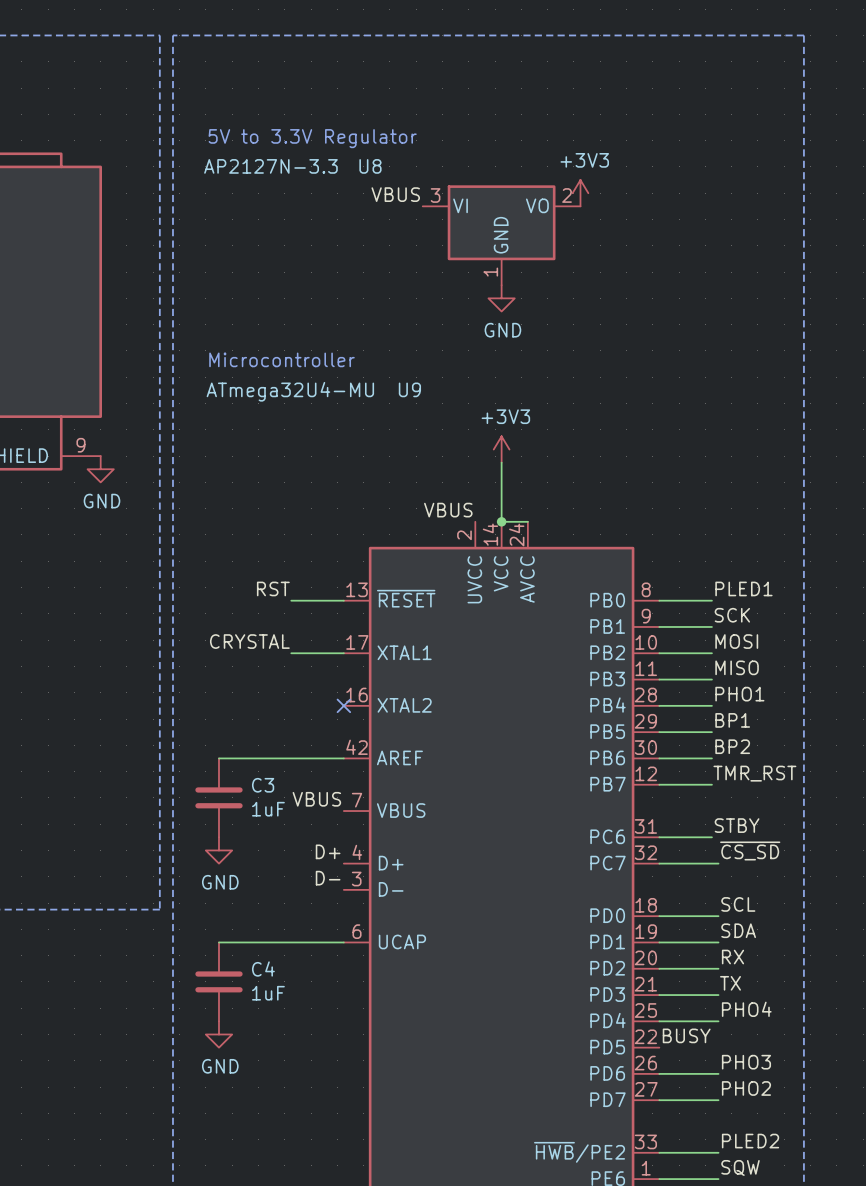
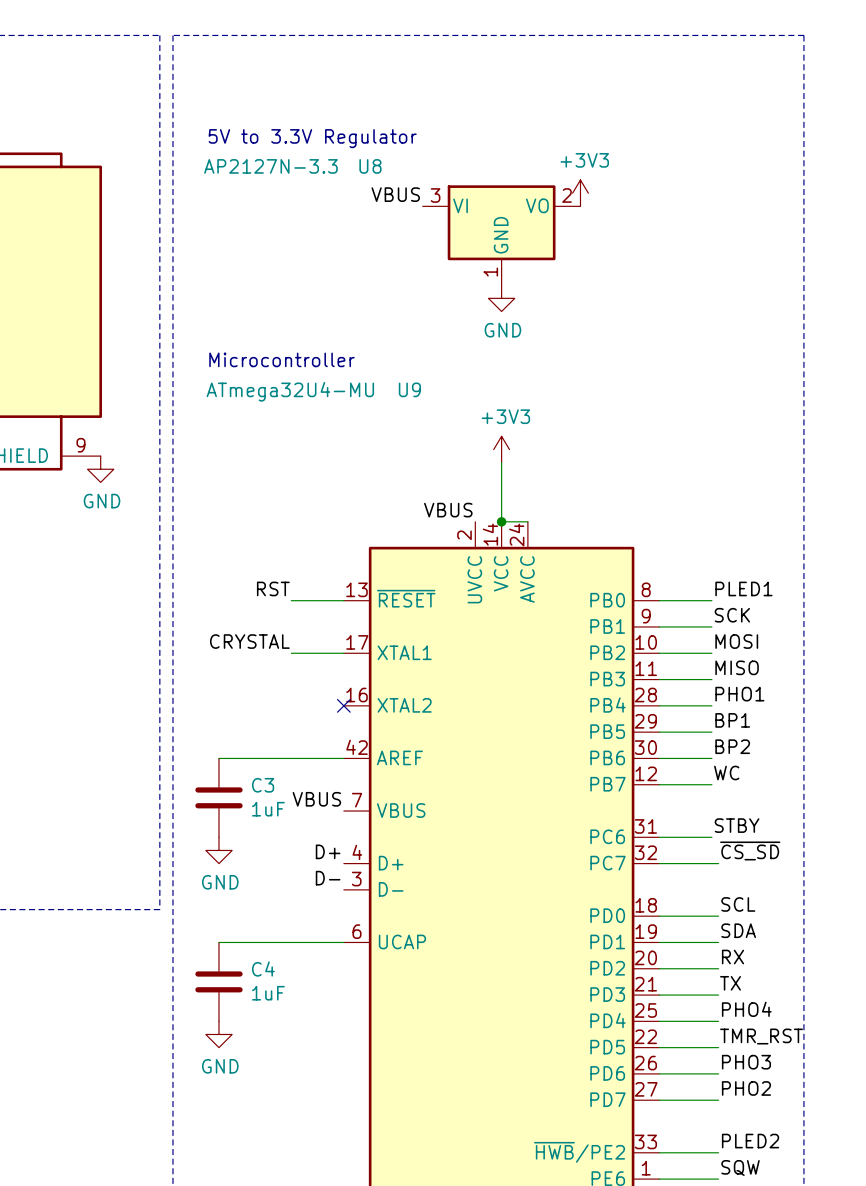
label: TMR_RST (754, 773) -> WC (726, 772)
label: BUSY (686, 1035) -> none
label: none -> TMR_RST (761, 1036)
wire: none -> (659, 1047) (718, 1047)

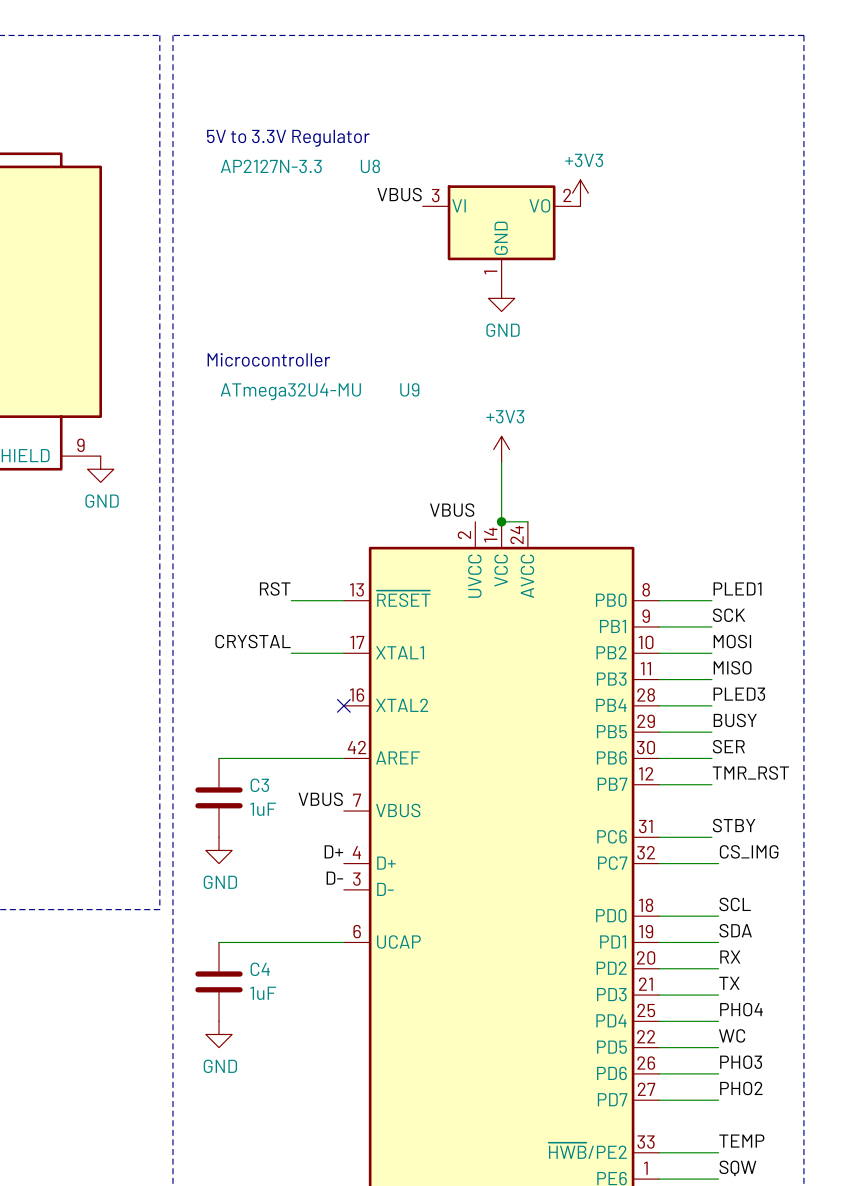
label: PHO1 (739, 694) -> PLED3 (739, 694)
label: BP1 (732, 720) -> BUSY (735, 720)
label: BP2 (732, 746) -> SER (728, 746)
label: WC (726, 772) -> TMR_RST (750, 772)
label: ~{CS_SD} (750, 850) -> CS_IMG (749, 851)
label: TMR_RST (761, 1036) -> WC (732, 1035)
label: PLED2 (750, 1141) -> TEMP (741, 1141)

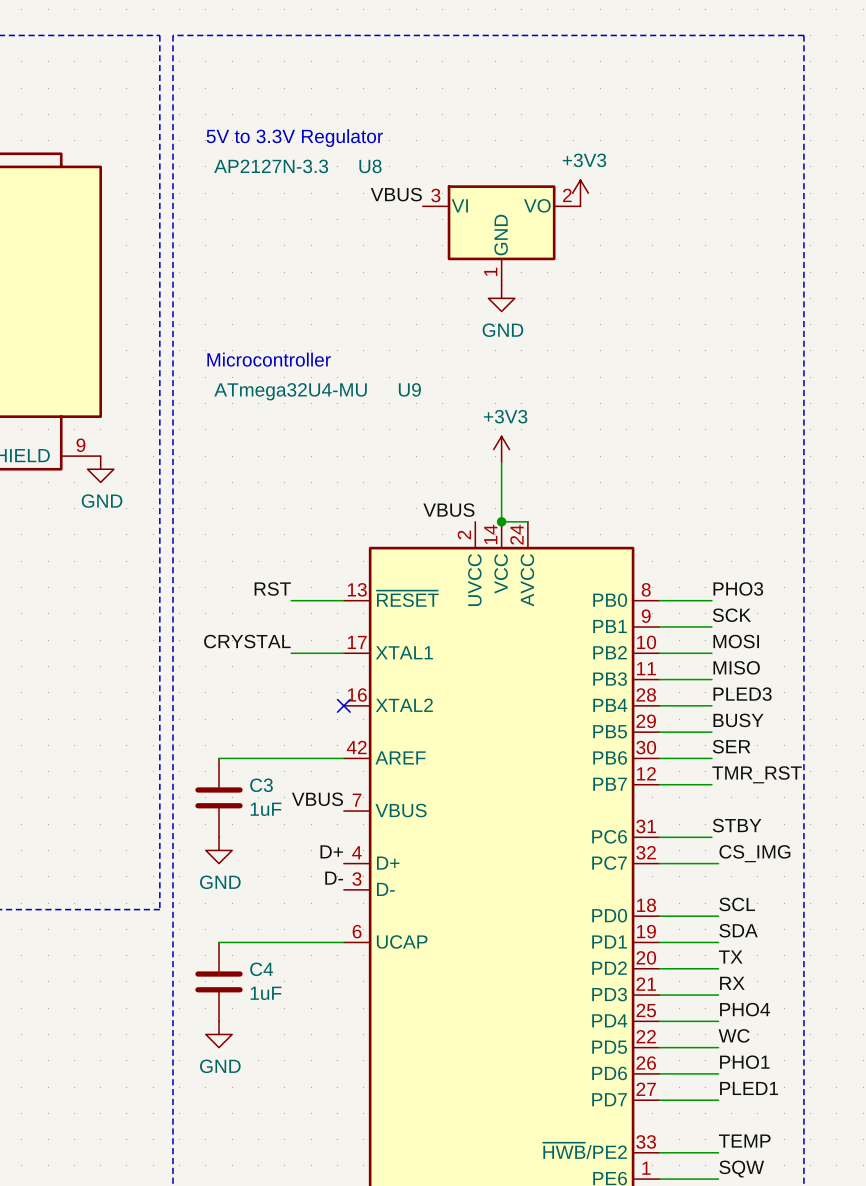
label: PLED1 (737, 588) -> PHO3 (738, 588)
label: RX (730, 957) -> TX (730, 957)
label: TX (729, 983) -> RX (732, 983)
label: PHO3 (741, 1062) -> PHO1 (744, 1062)
label: PHO2 (741, 1088) -> PLED1 (749, 1088)

